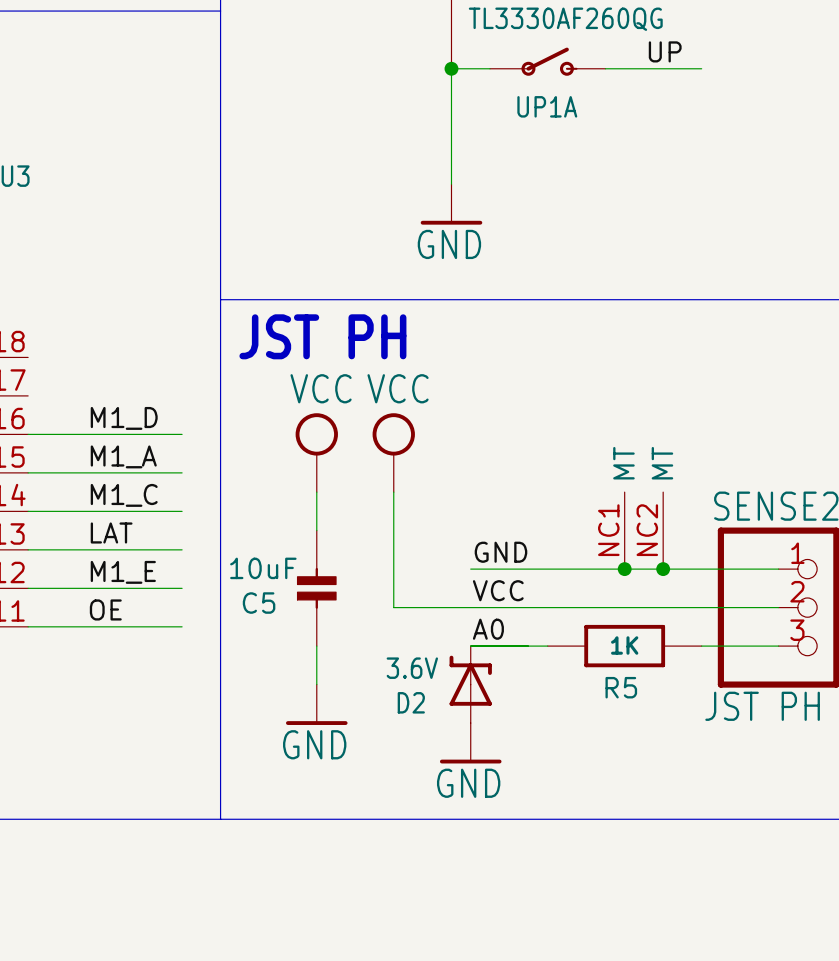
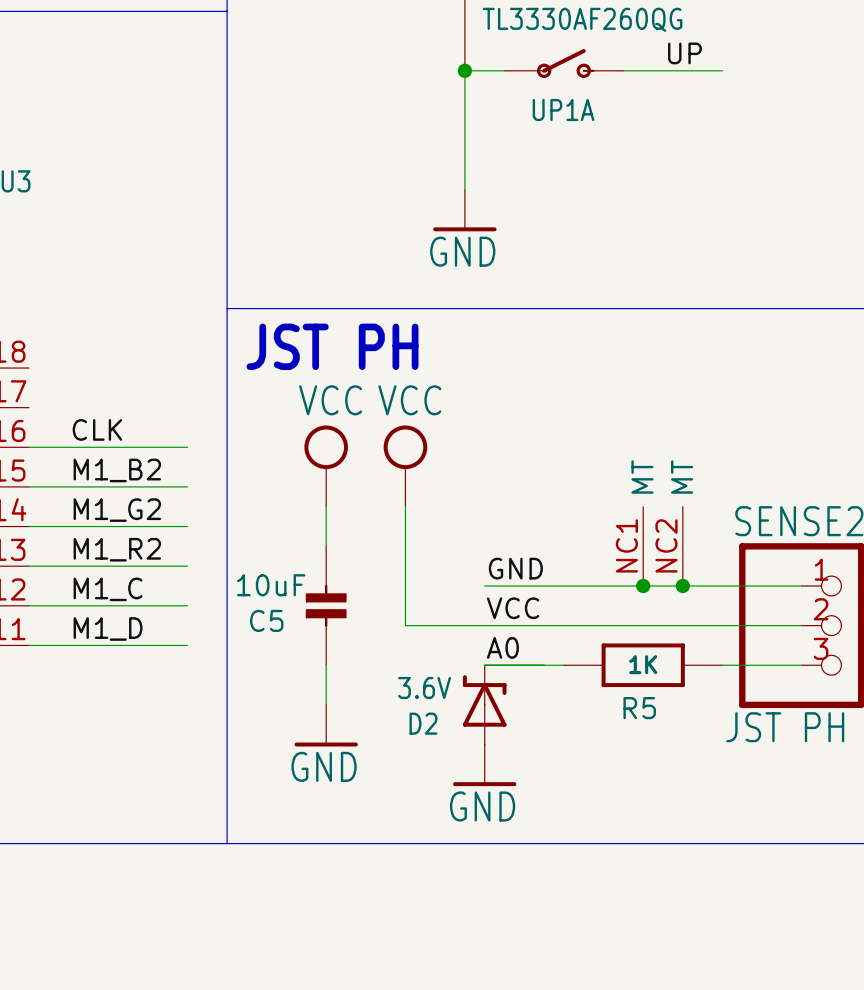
label: none -> CLK (97, 429)
label position: M1_D (124, 418) -> M1_D (108, 628)
label: M1_A (123, 456) -> M1_B2 (117, 470)
label: none -> M1_G2 (117, 510)
label position: M1_C (124, 495) -> M1_C (108, 589)
label: LAT (111, 532) -> none
label: M1_E (123, 572) -> M1_R2 (117, 549)
label: OE (105, 609) -> none

